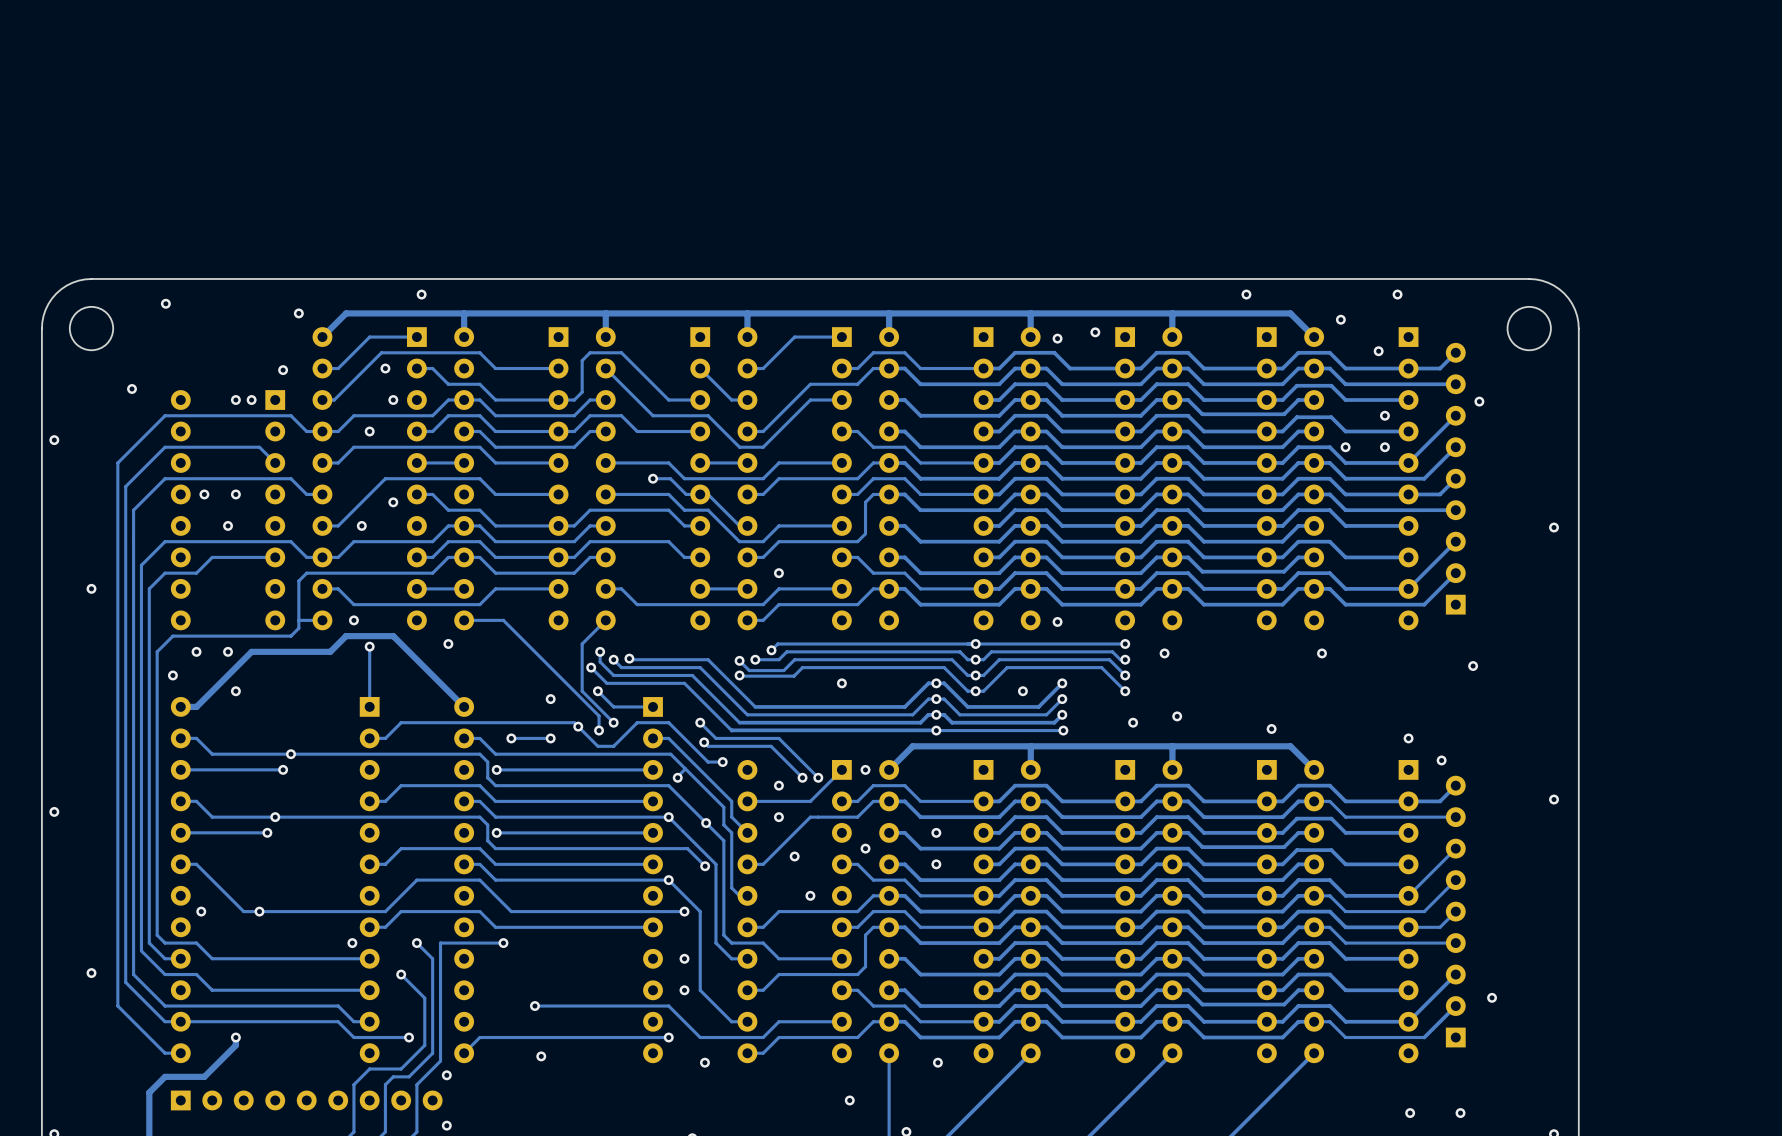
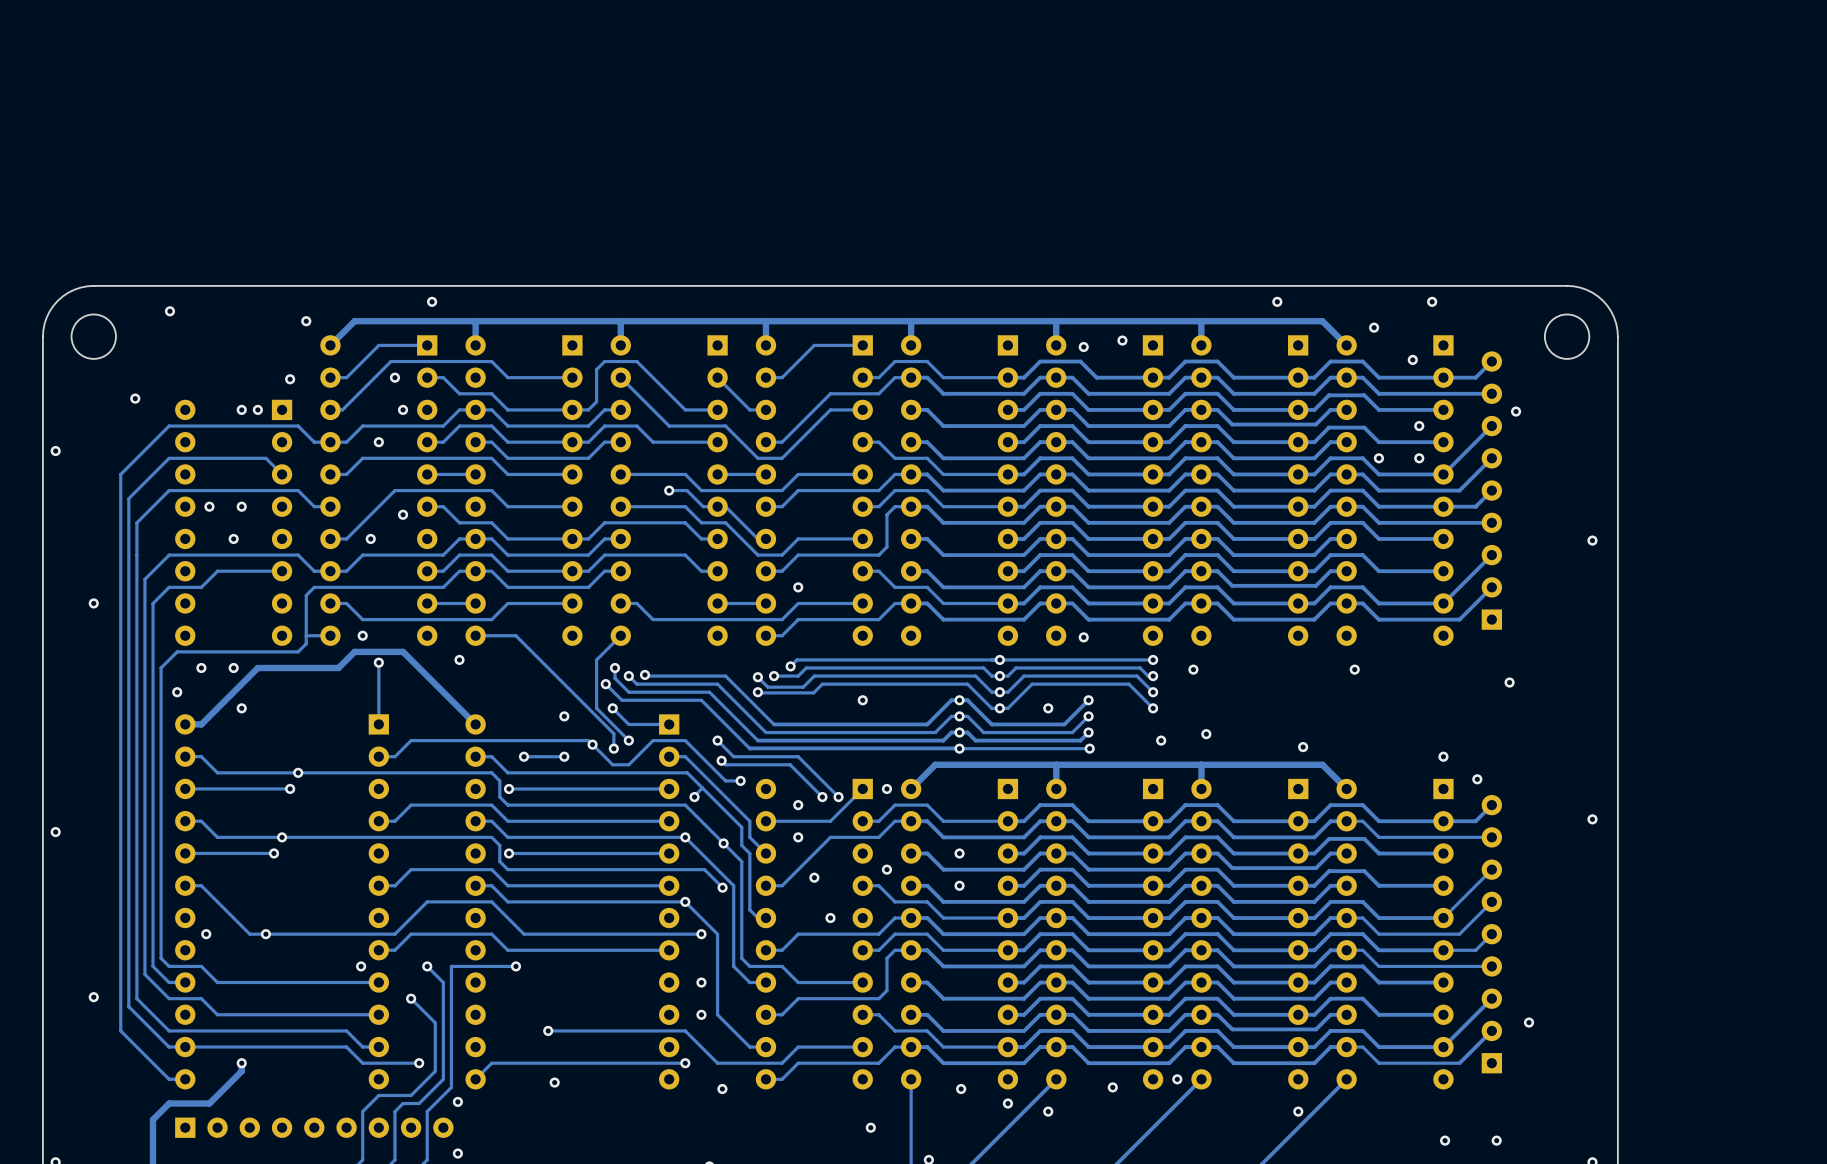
via: none -> (1177, 1079)
via: none -> (1112, 1087)
via: none -> (1007, 1103)
via: none -> (1048, 1111)
via: none -> (1298, 1111)

